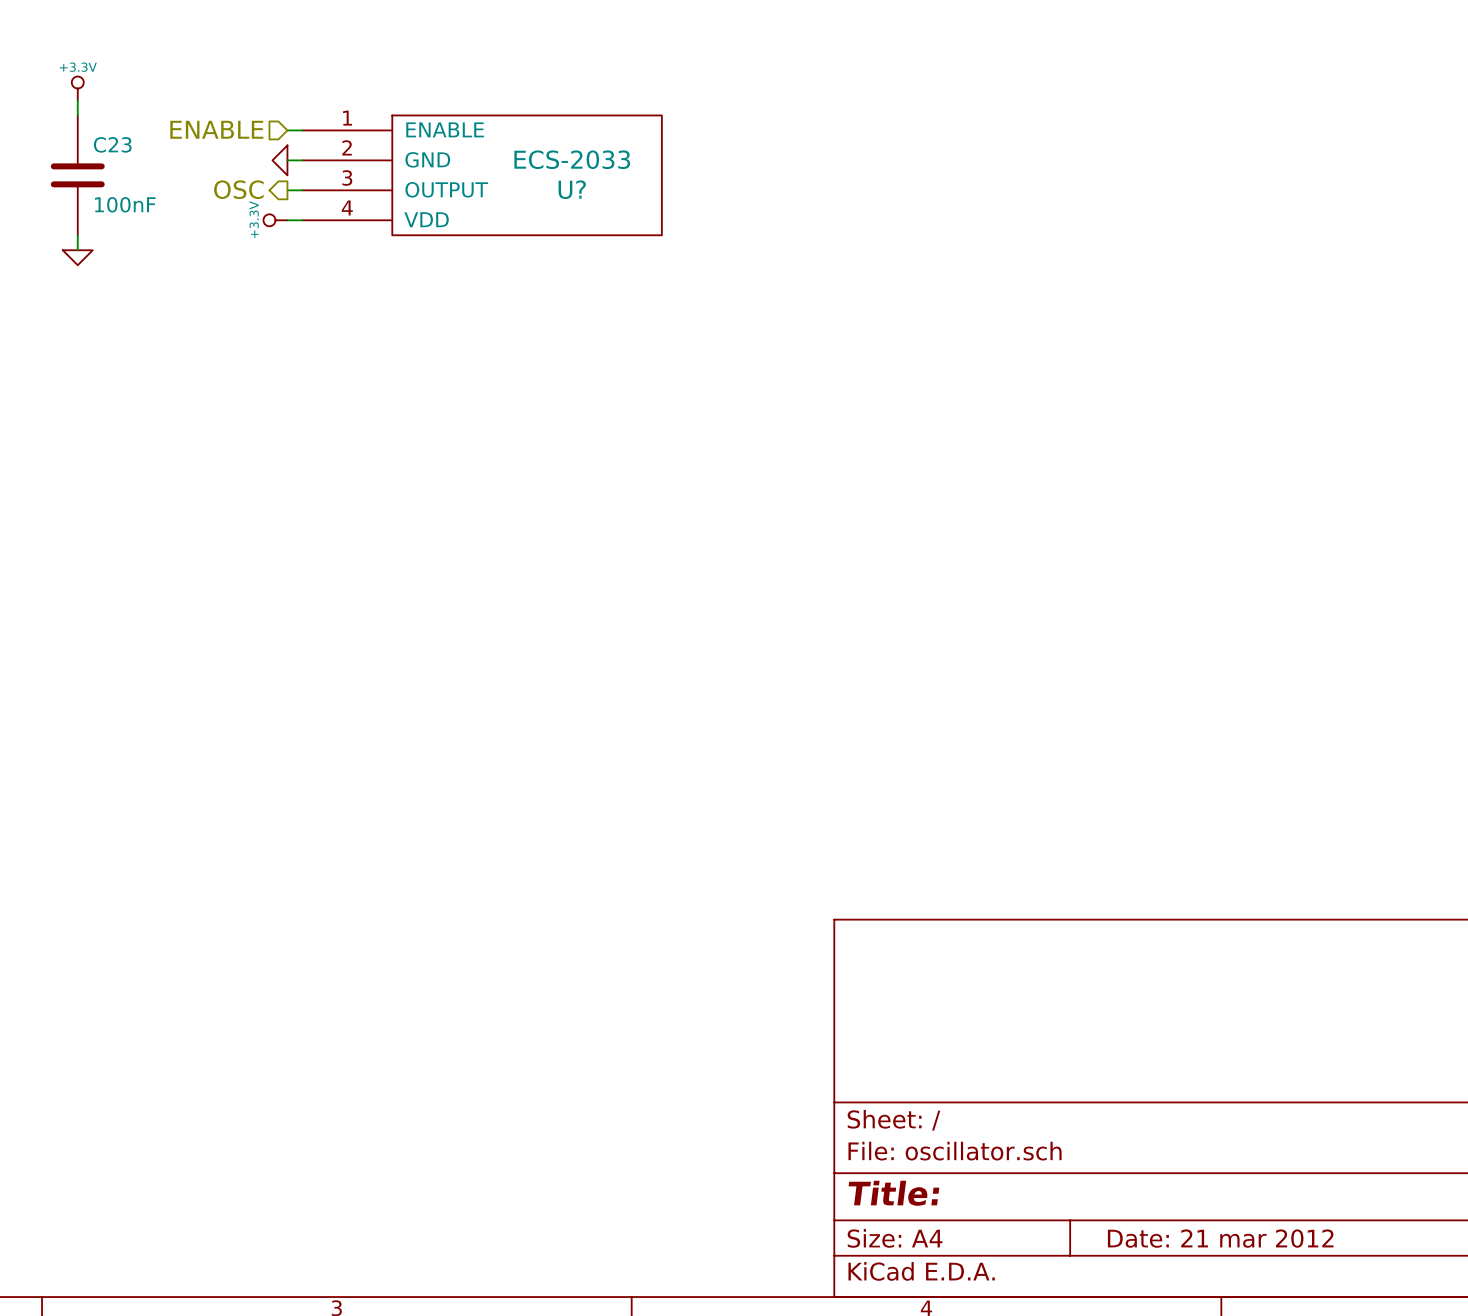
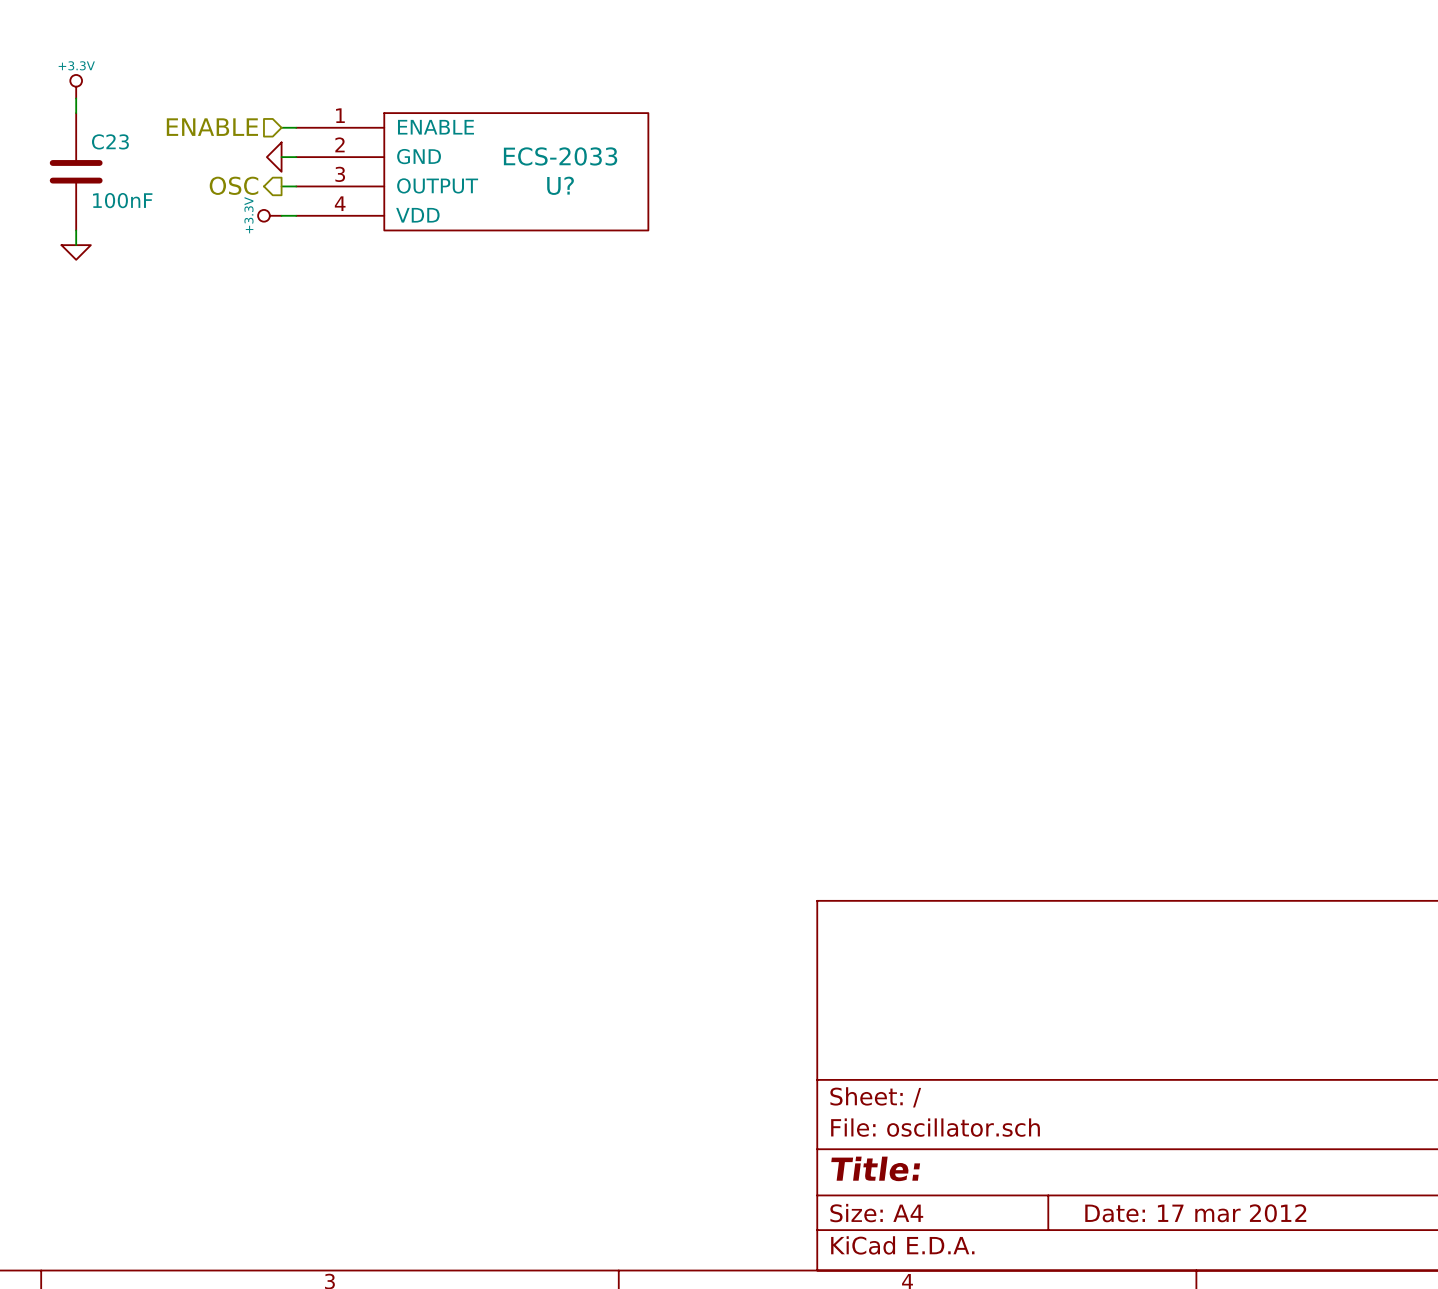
title block: Date: 21 mar 2012 (1220, 1238) -> Date: 17 mar 2012 (1195, 1213)

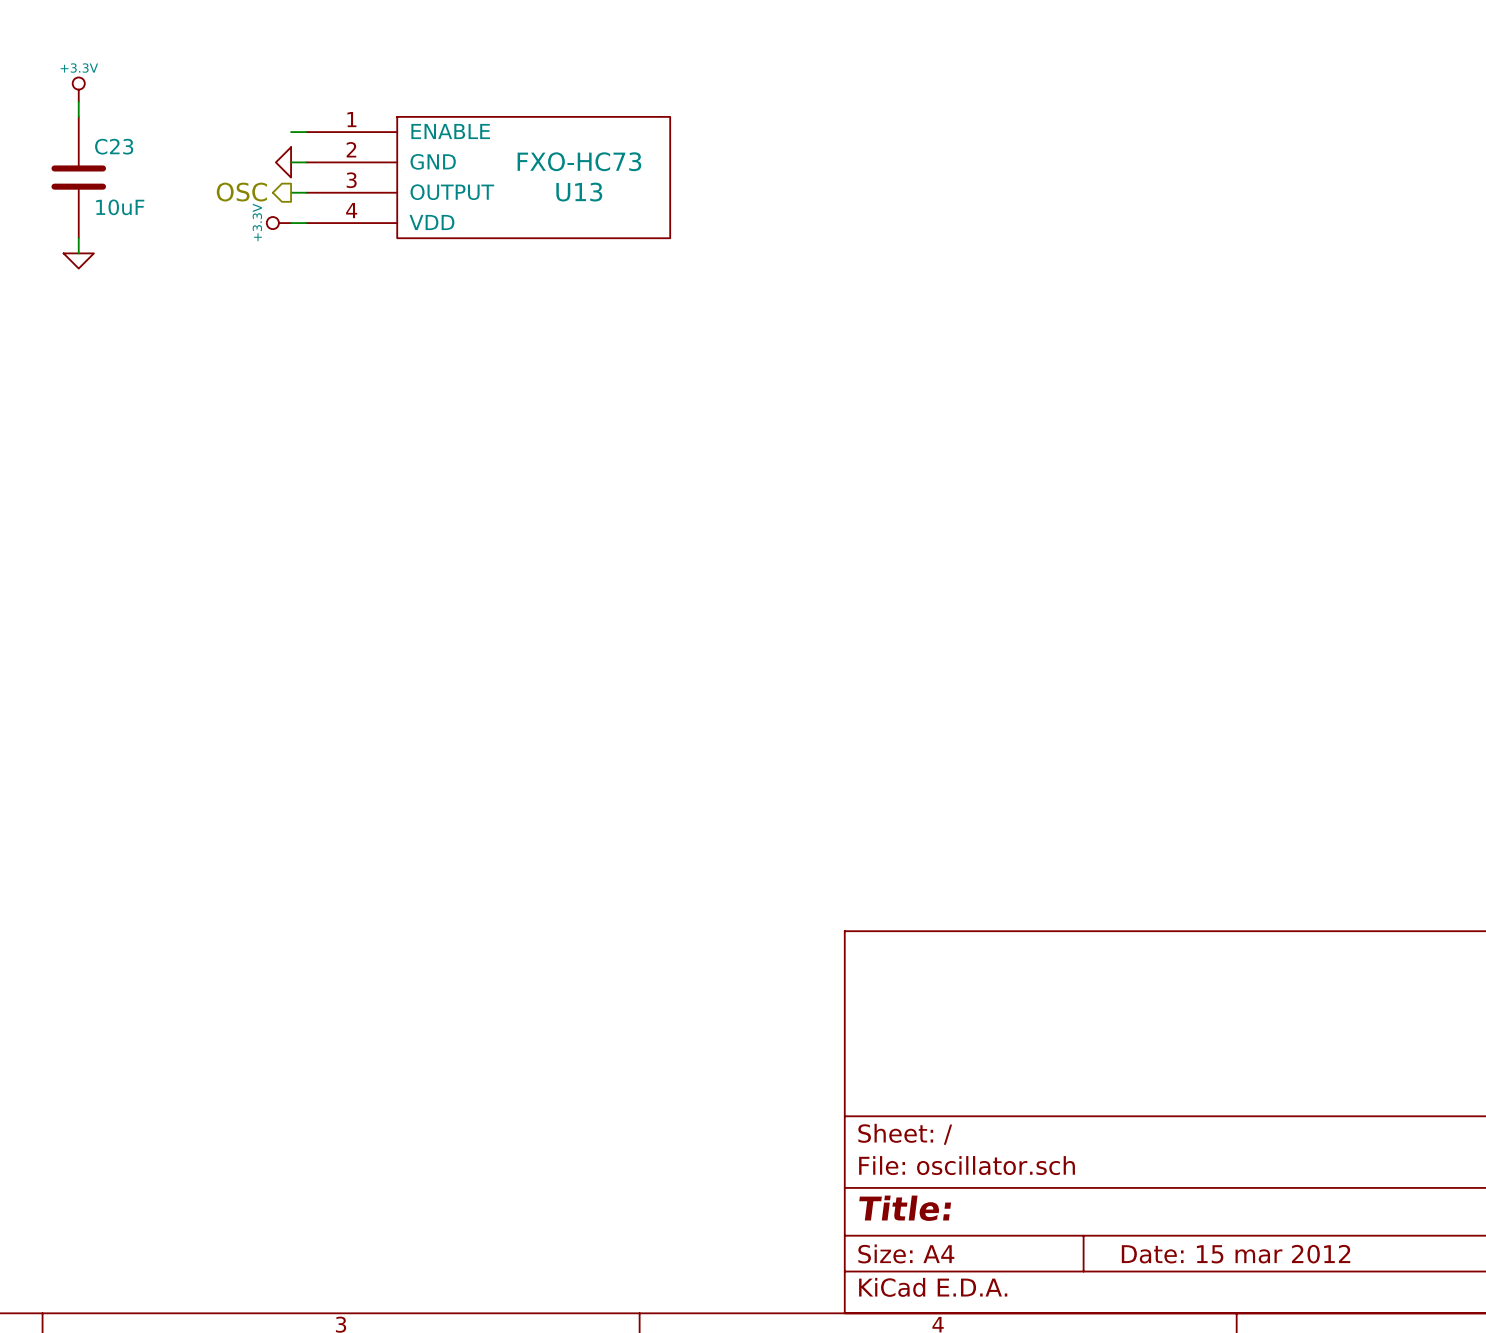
hierarchical label: ENABLE (212, 127) -> none
U? value: ECS-2033 (560, 156) -> FXO-HC73 (579, 161)
U? name: U? (560, 185) -> U13 (579, 192)
C23 value: 100nF (122, 200) -> 10uF (120, 207)
title block: Date: 17 mar 2012 (1195, 1213) -> Date: 15 mar 2012 (1236, 1254)

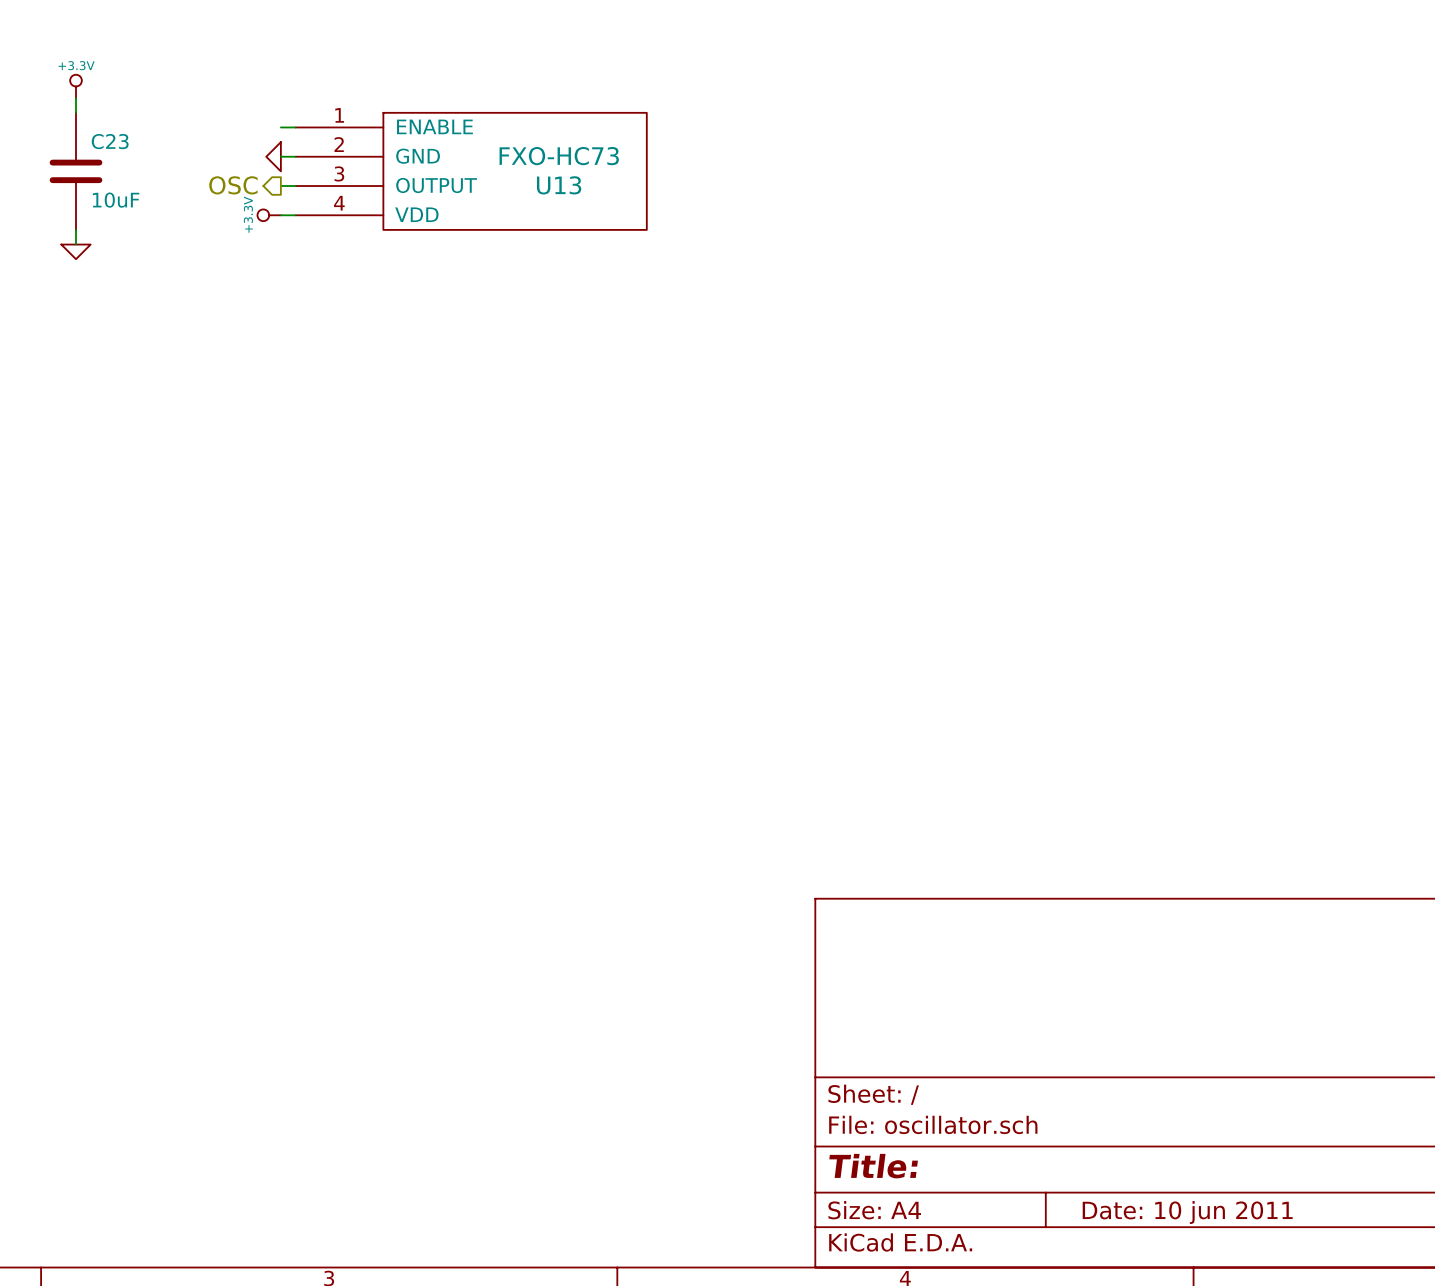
title block: Date: 15 mar 2012 (1236, 1254) -> Date: 10 jun 2011 (1187, 1212)

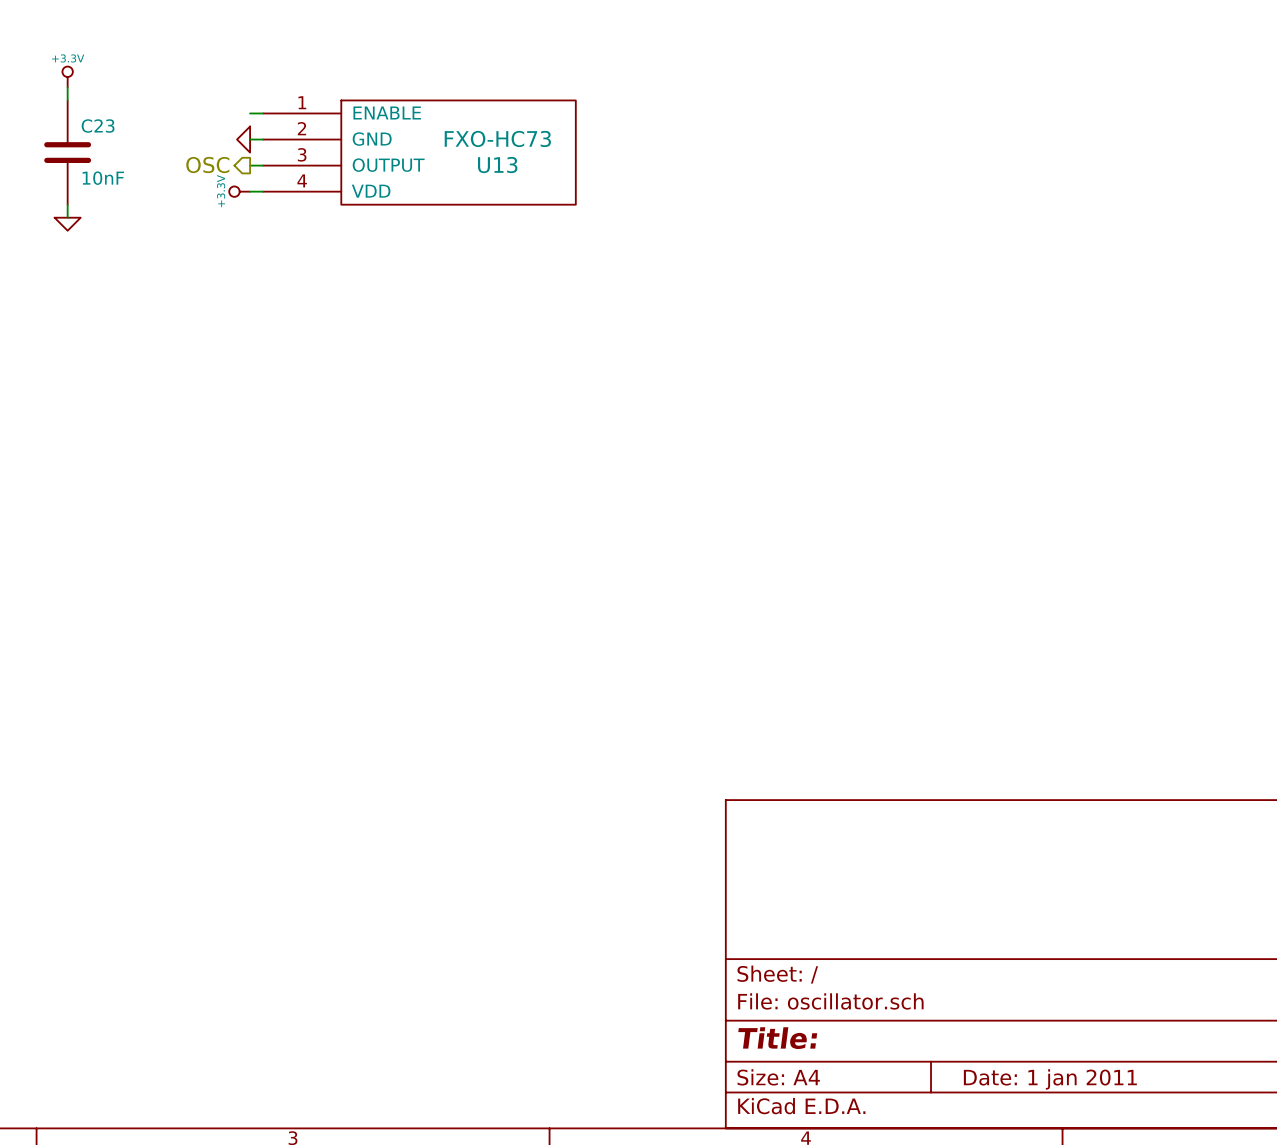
C23 value: 10uF (116, 200) -> 10nF (103, 178)
title block: Date: 10 jun 2011 (1187, 1212) -> Date: 1 jan 2011 (1050, 1079)

